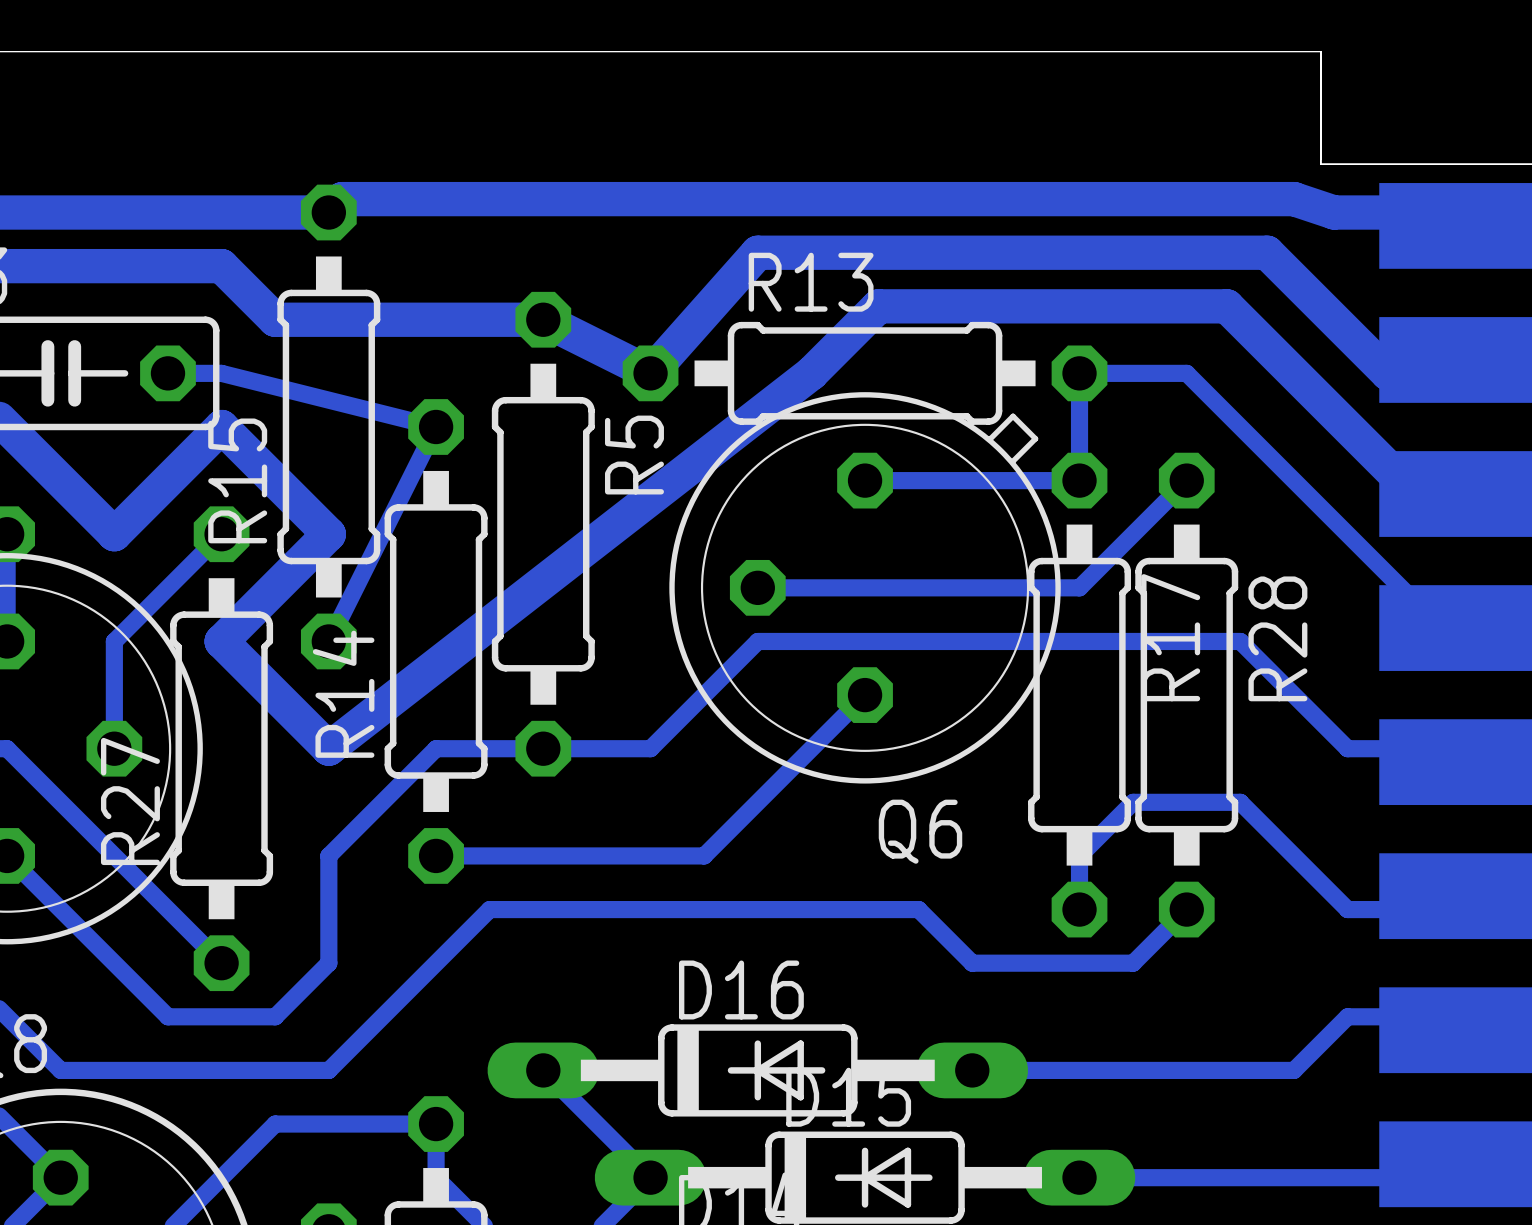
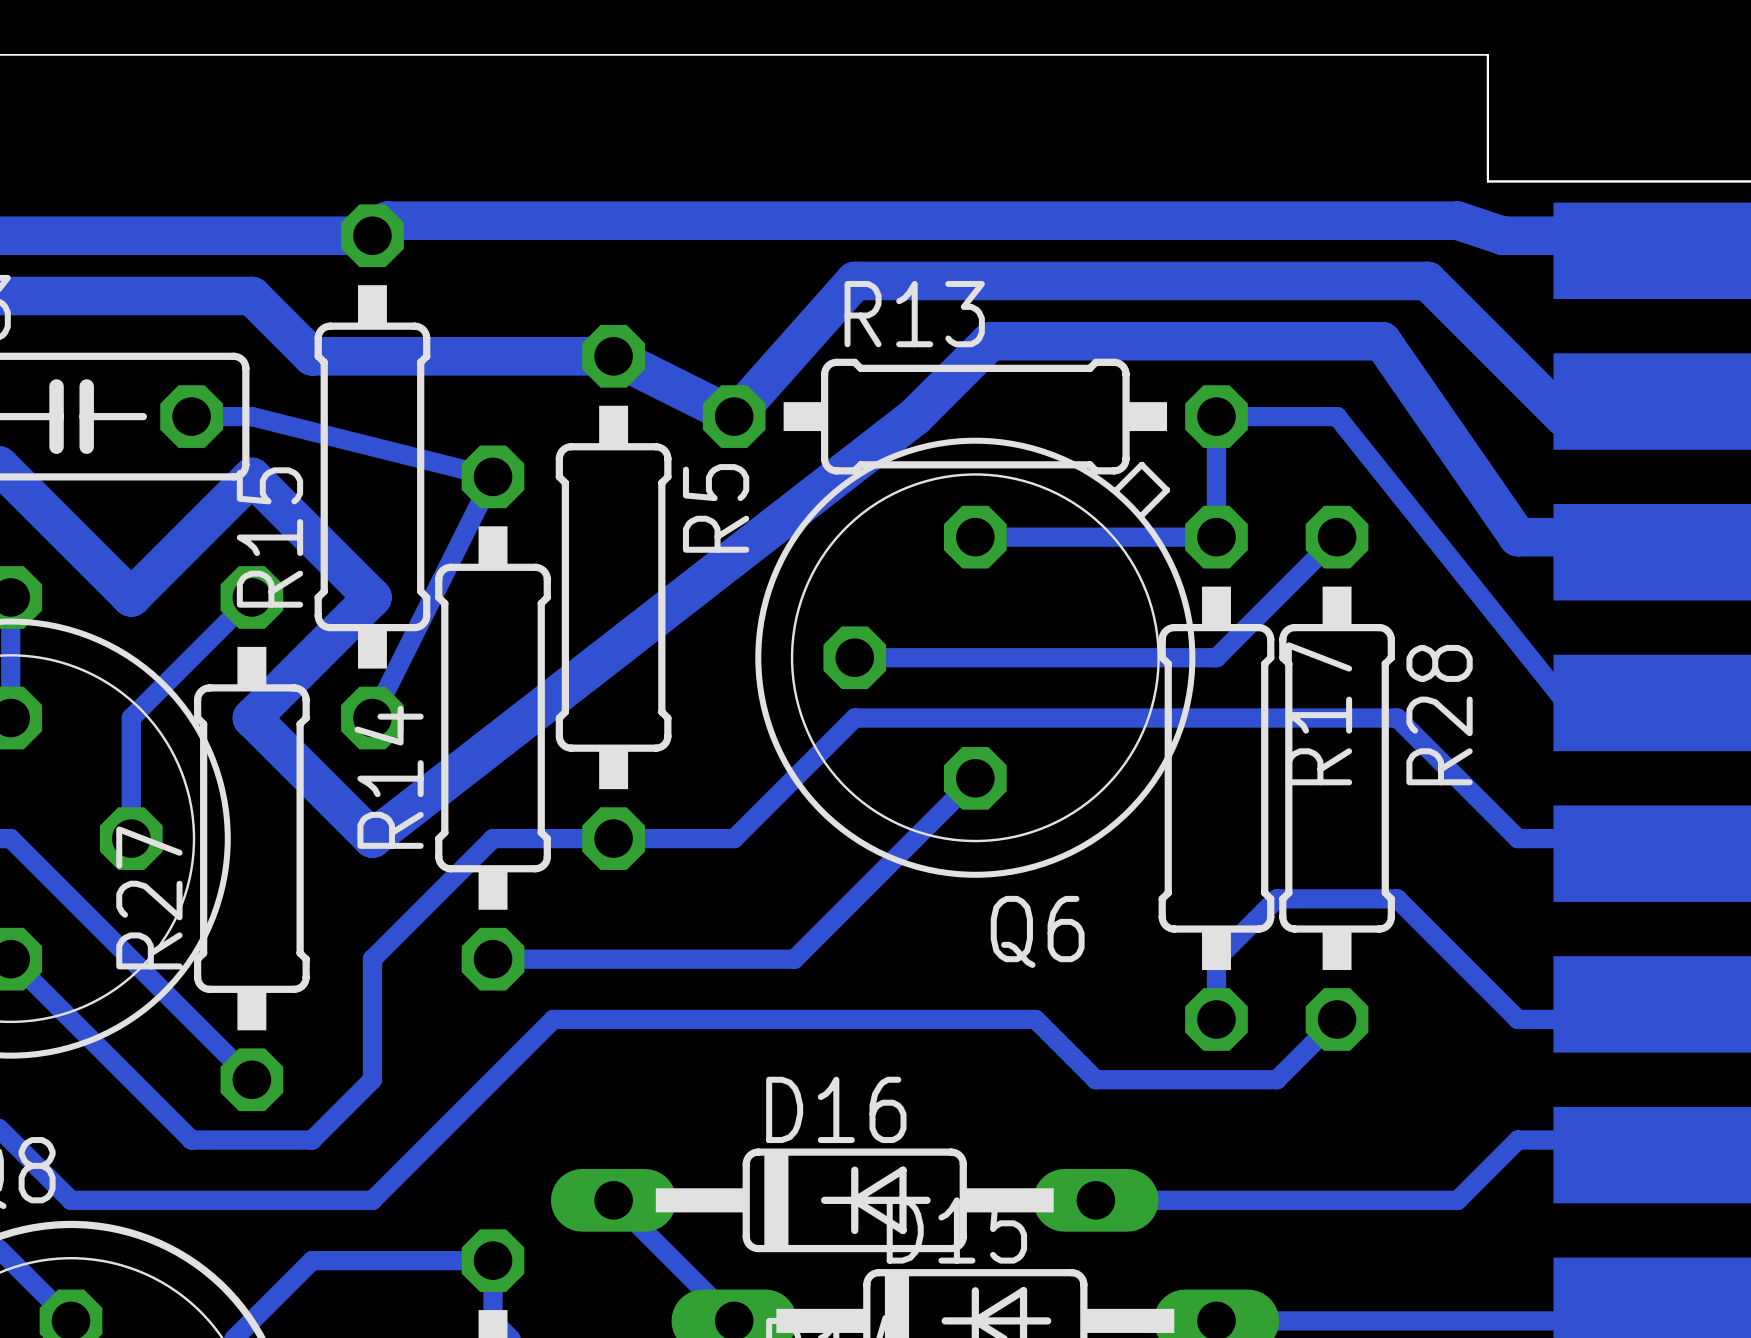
bottom track: (1226, 306) (1401, 480) -> (1382, 341) (1517, 537) (1578, 537)
bottom track: (1186, 373) (1454, 641) -> (1337, 416) (1578, 718) (1638, 718)

